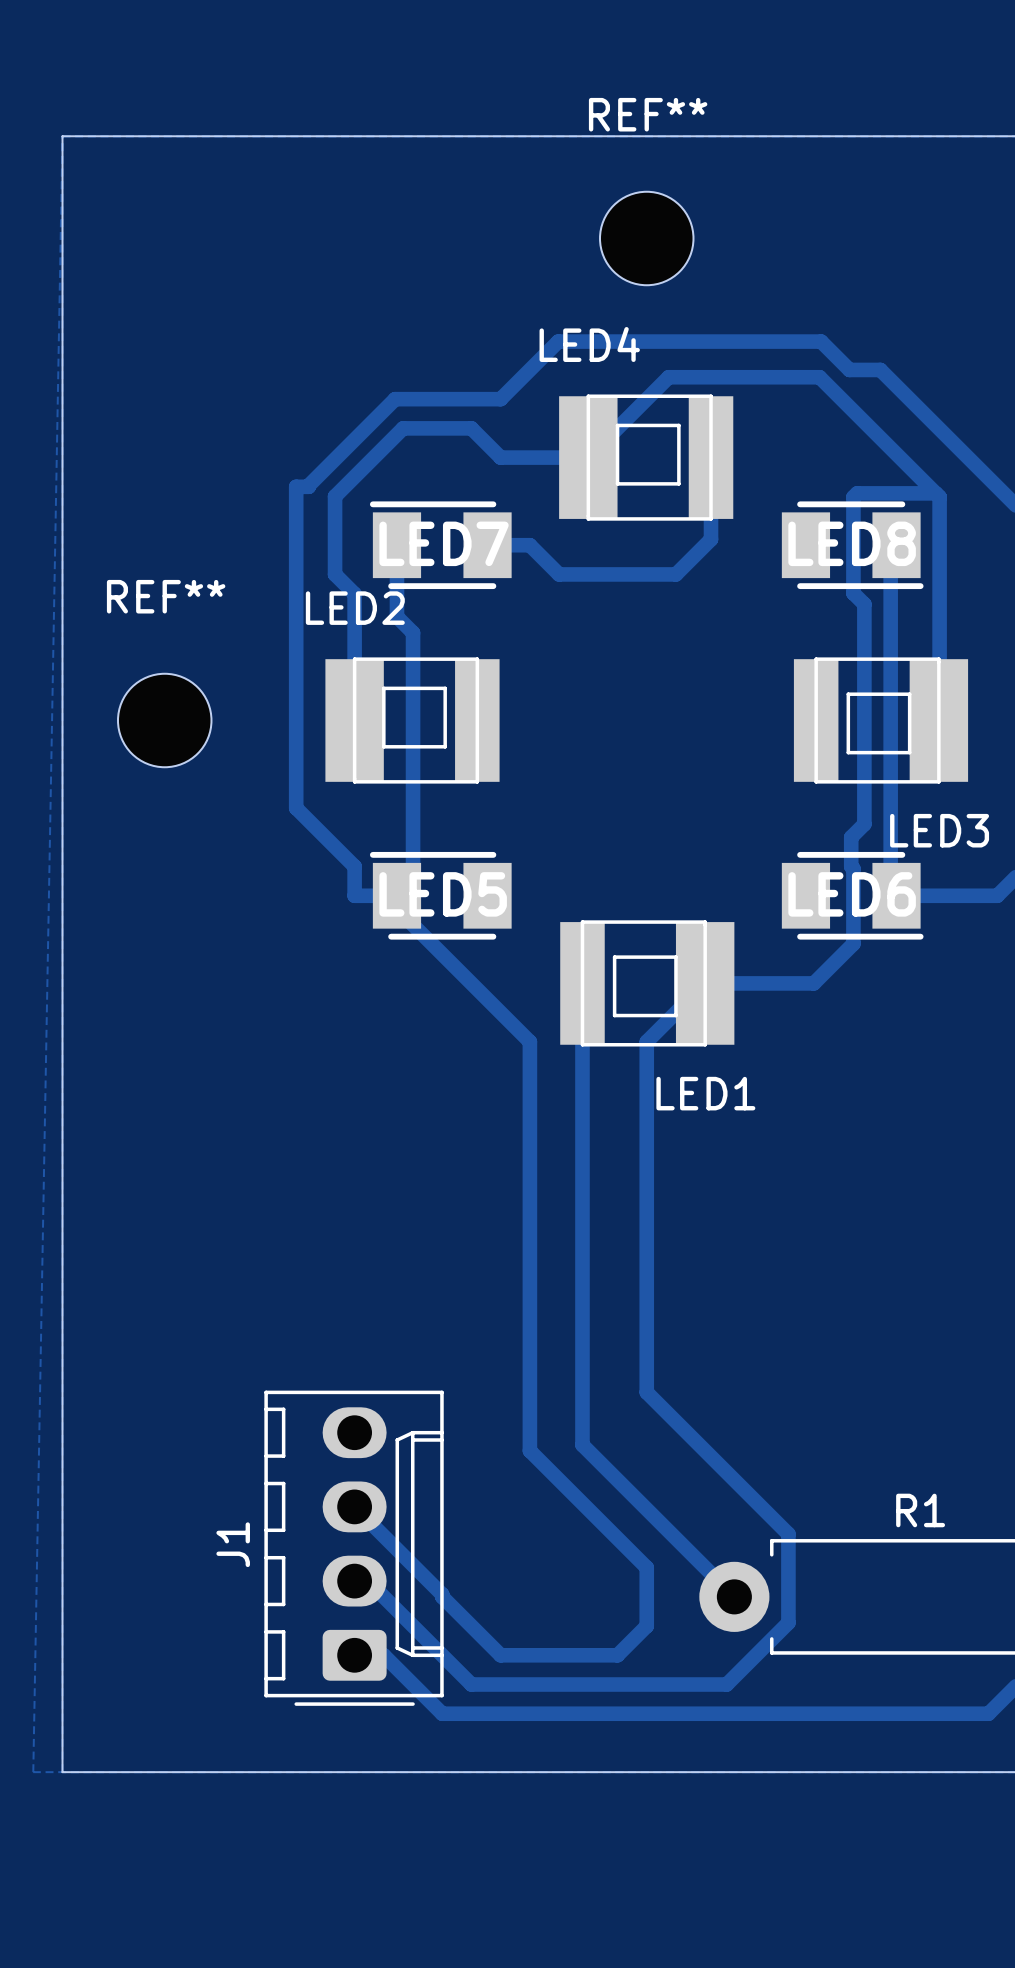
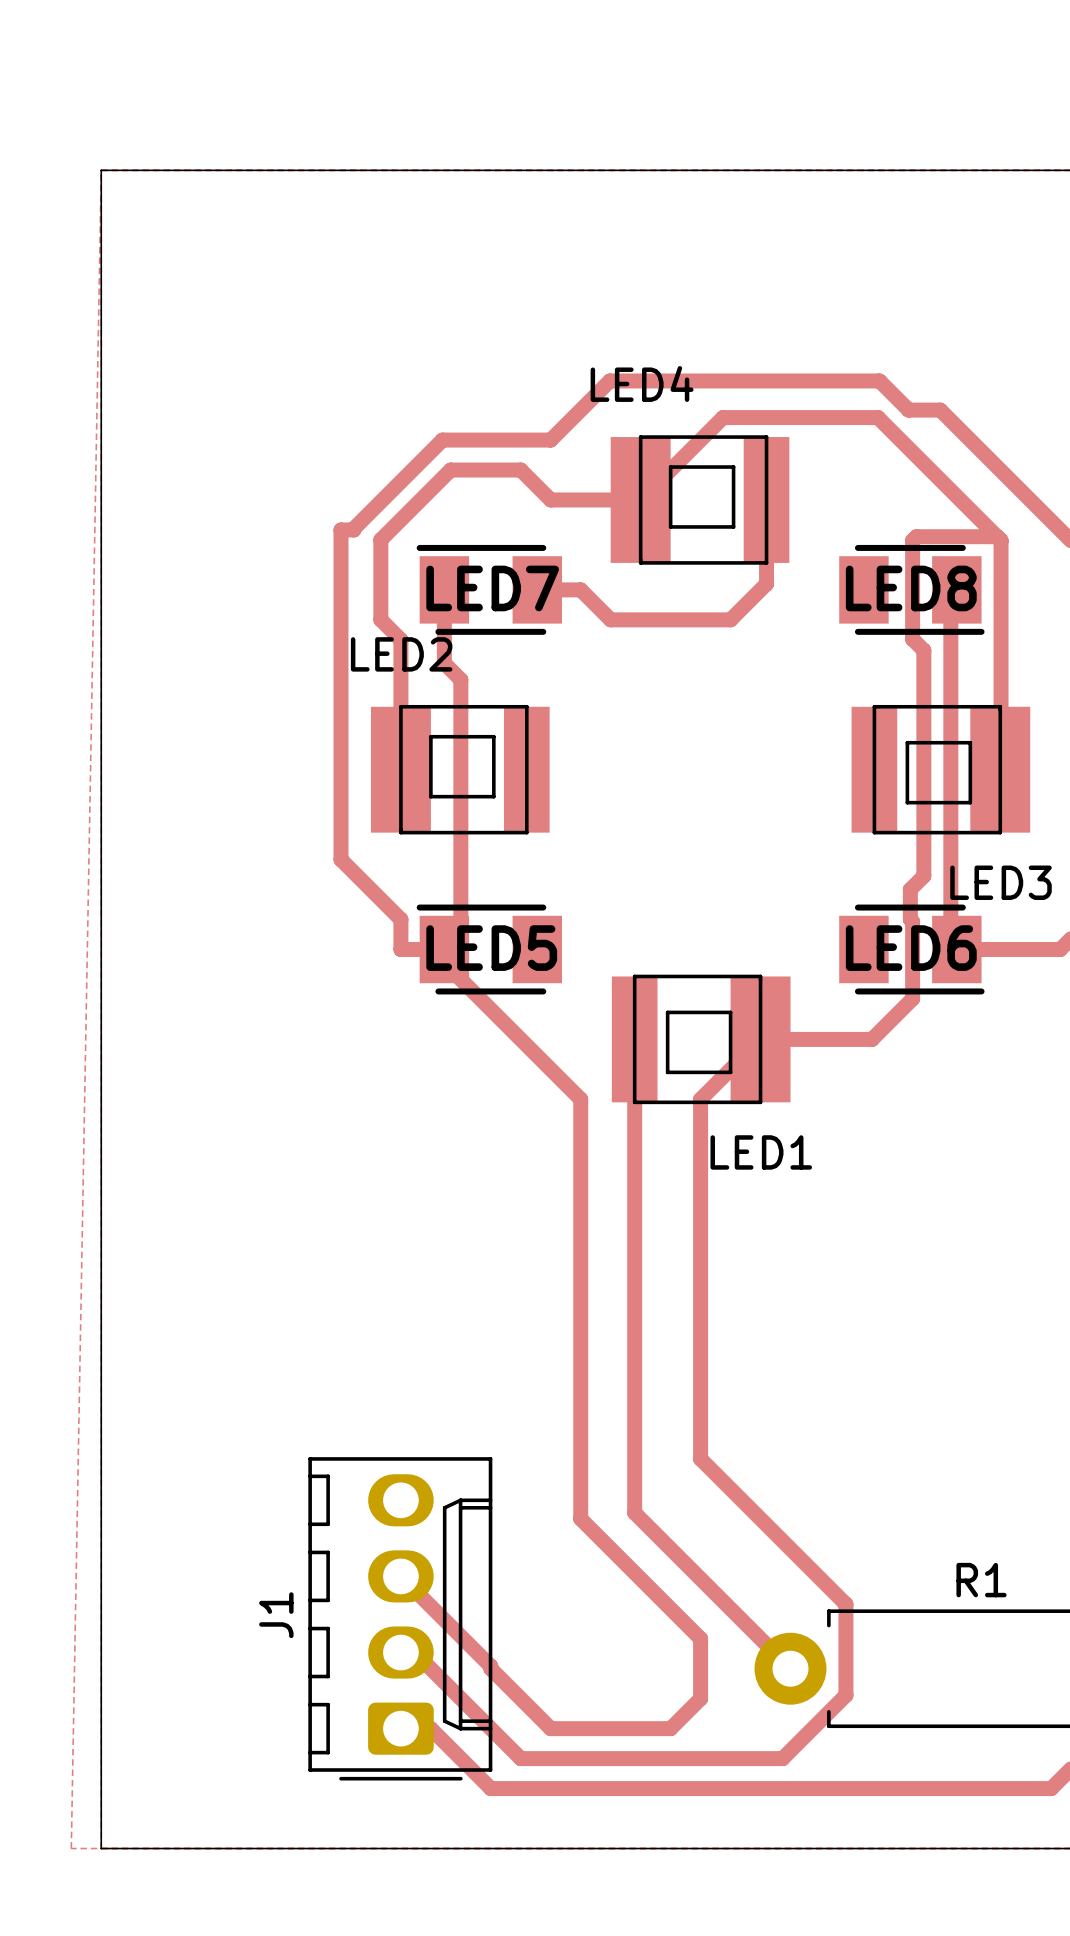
REF**: (646, 238) -> none
REF**: (164, 720) -> none

